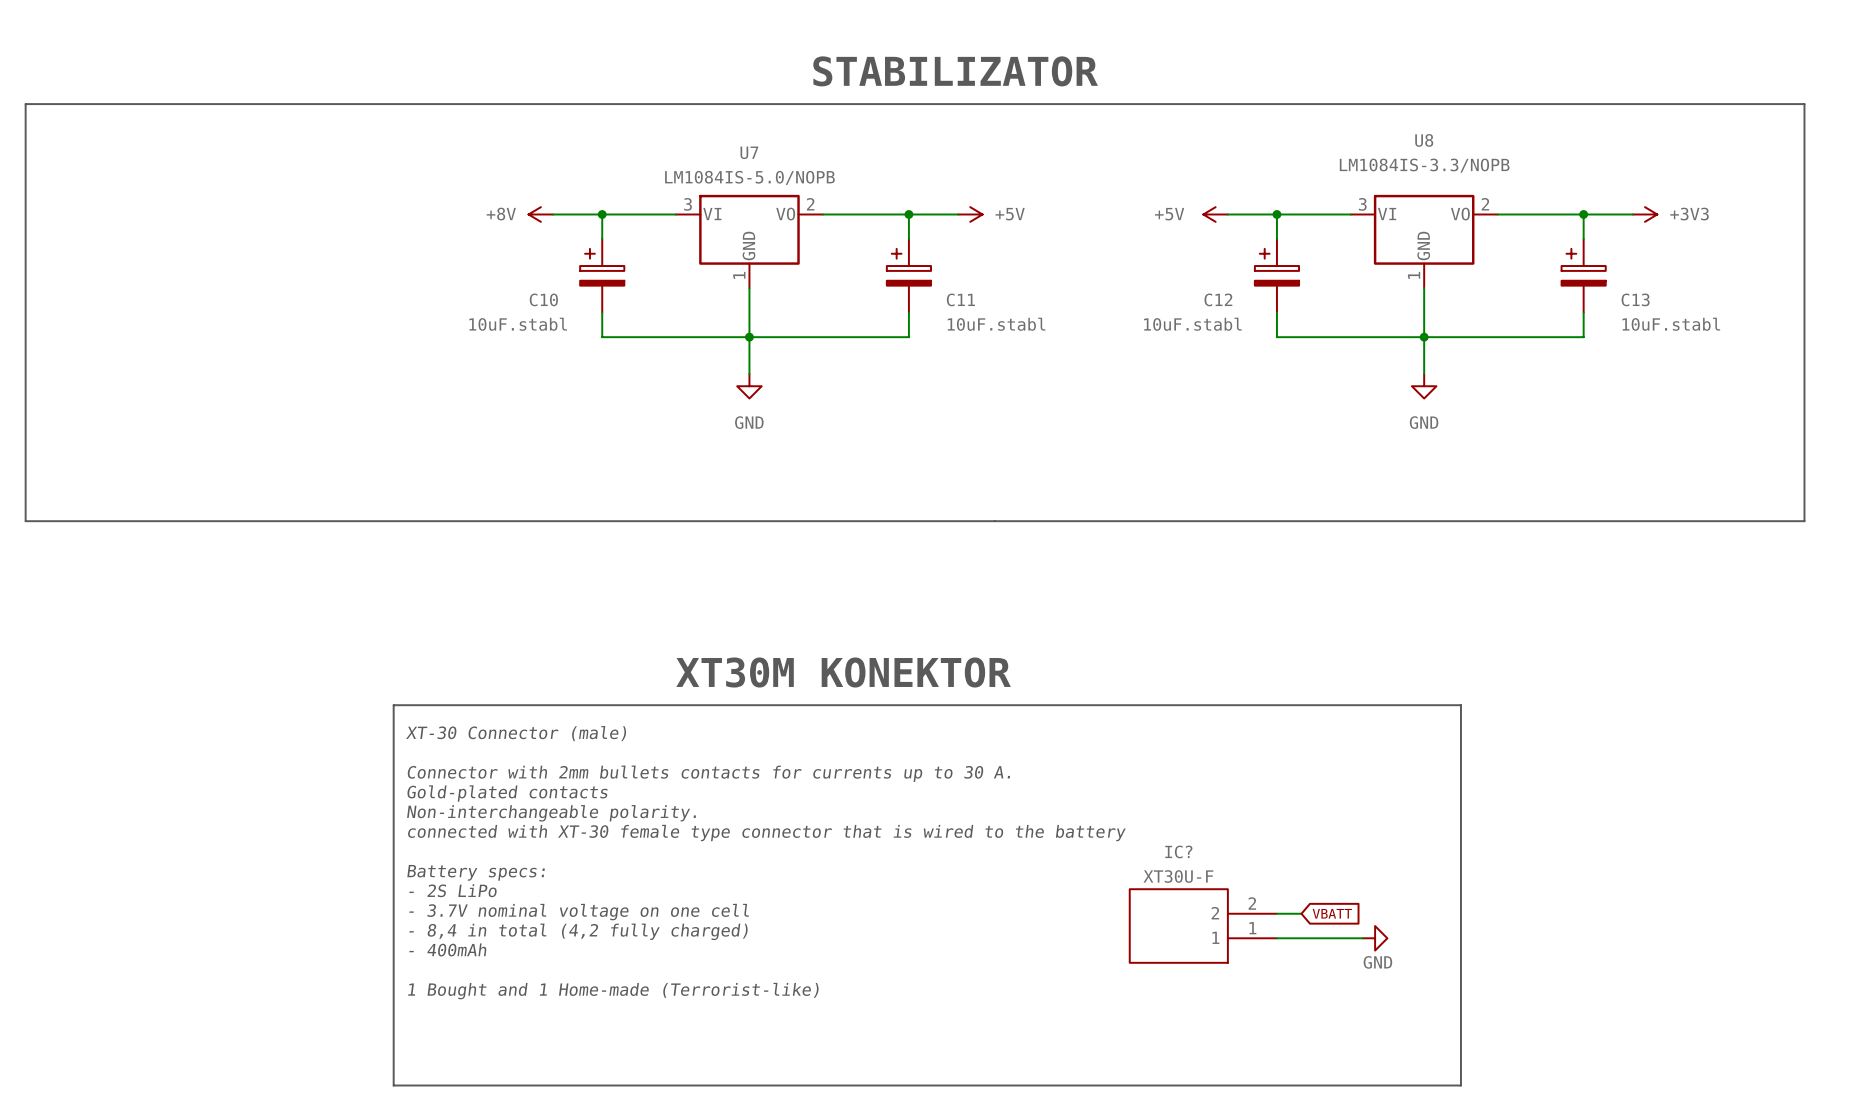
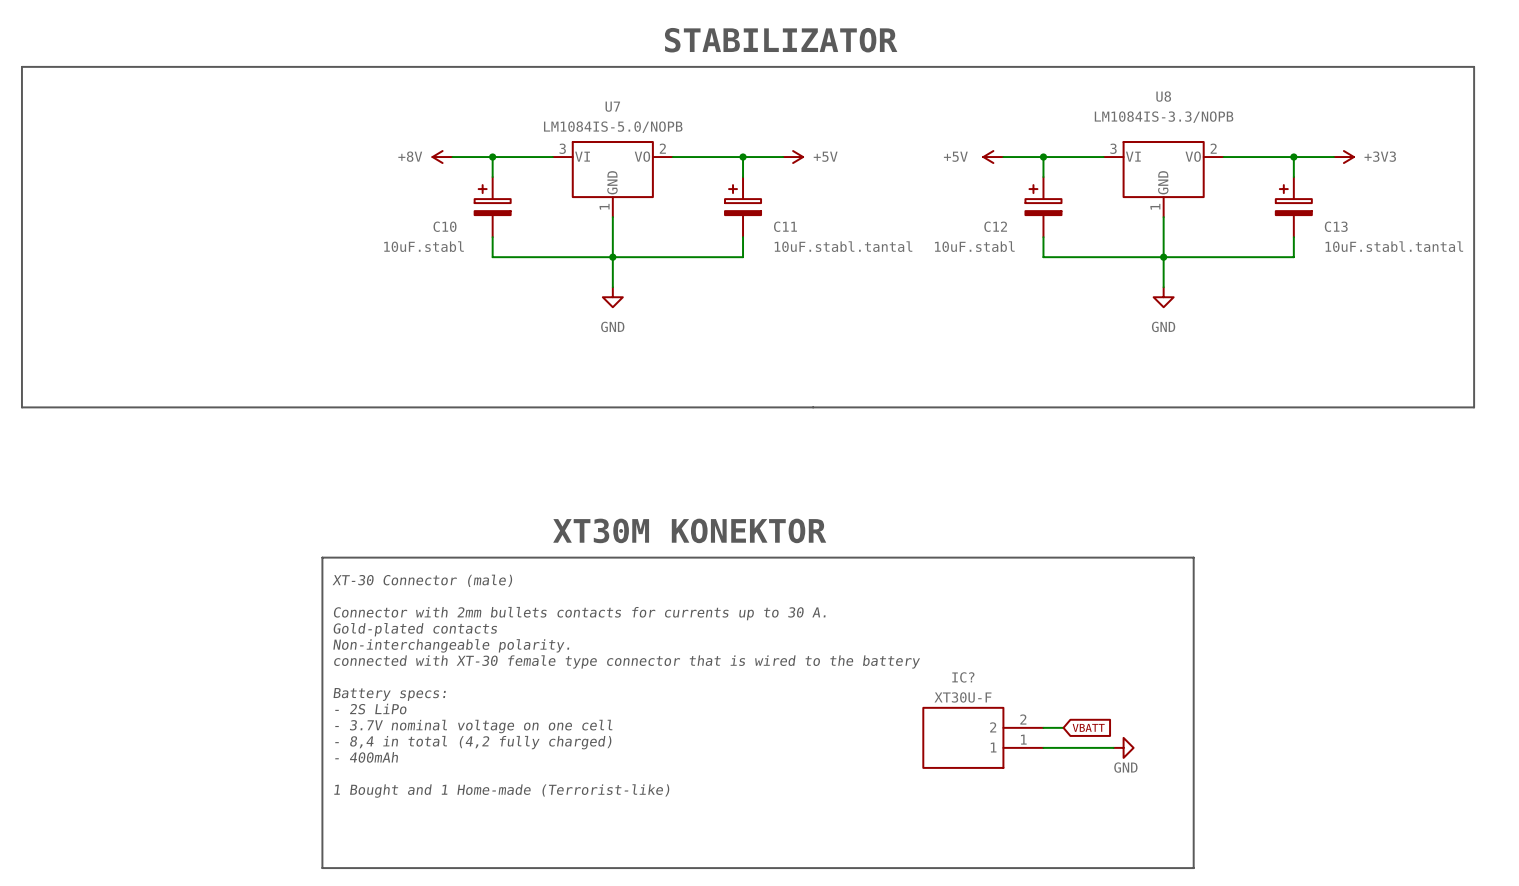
C11 value: 10uF.stabl (996, 324) -> 10uF.stabl.tantal (843, 246)
C13 value: 10uF.stabl (1671, 324) -> 10uF.stabl.tantal (1394, 246)

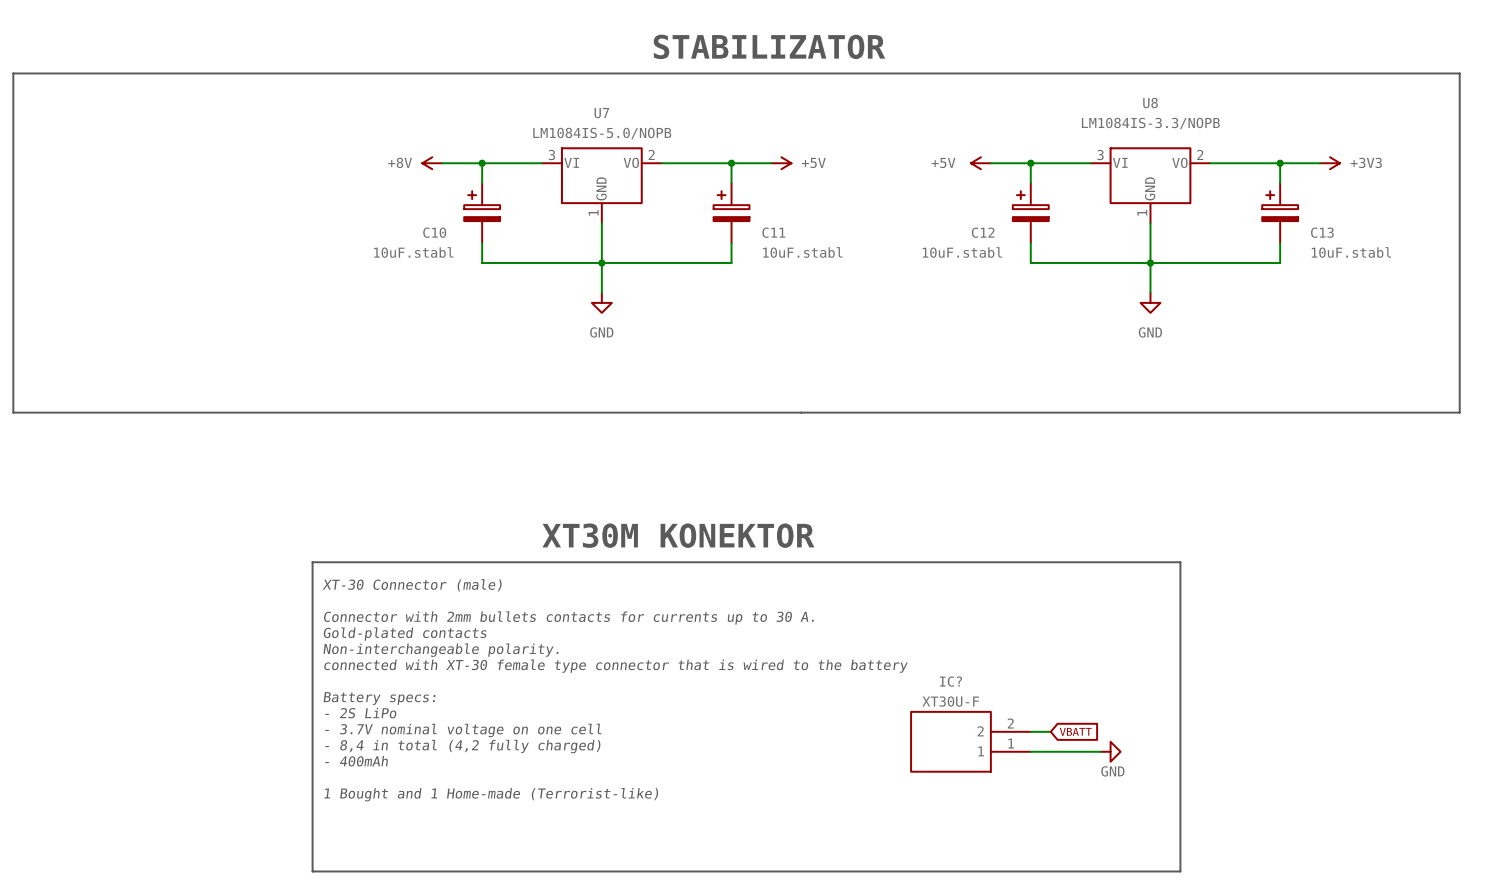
C11 value: 10uF.stabl.tantal (843, 246) -> 10uF.stabl (802, 252)
C13 value: 10uF.stabl.tantal (1394, 246) -> 10uF.stabl (1351, 252)

